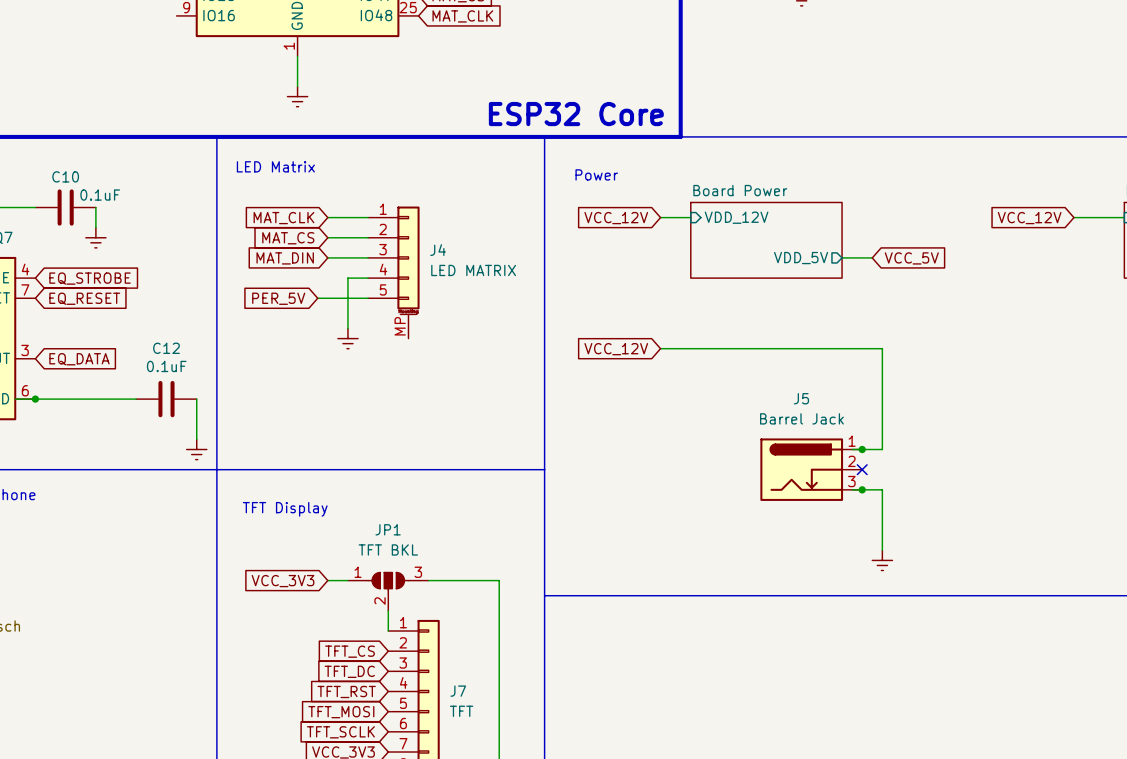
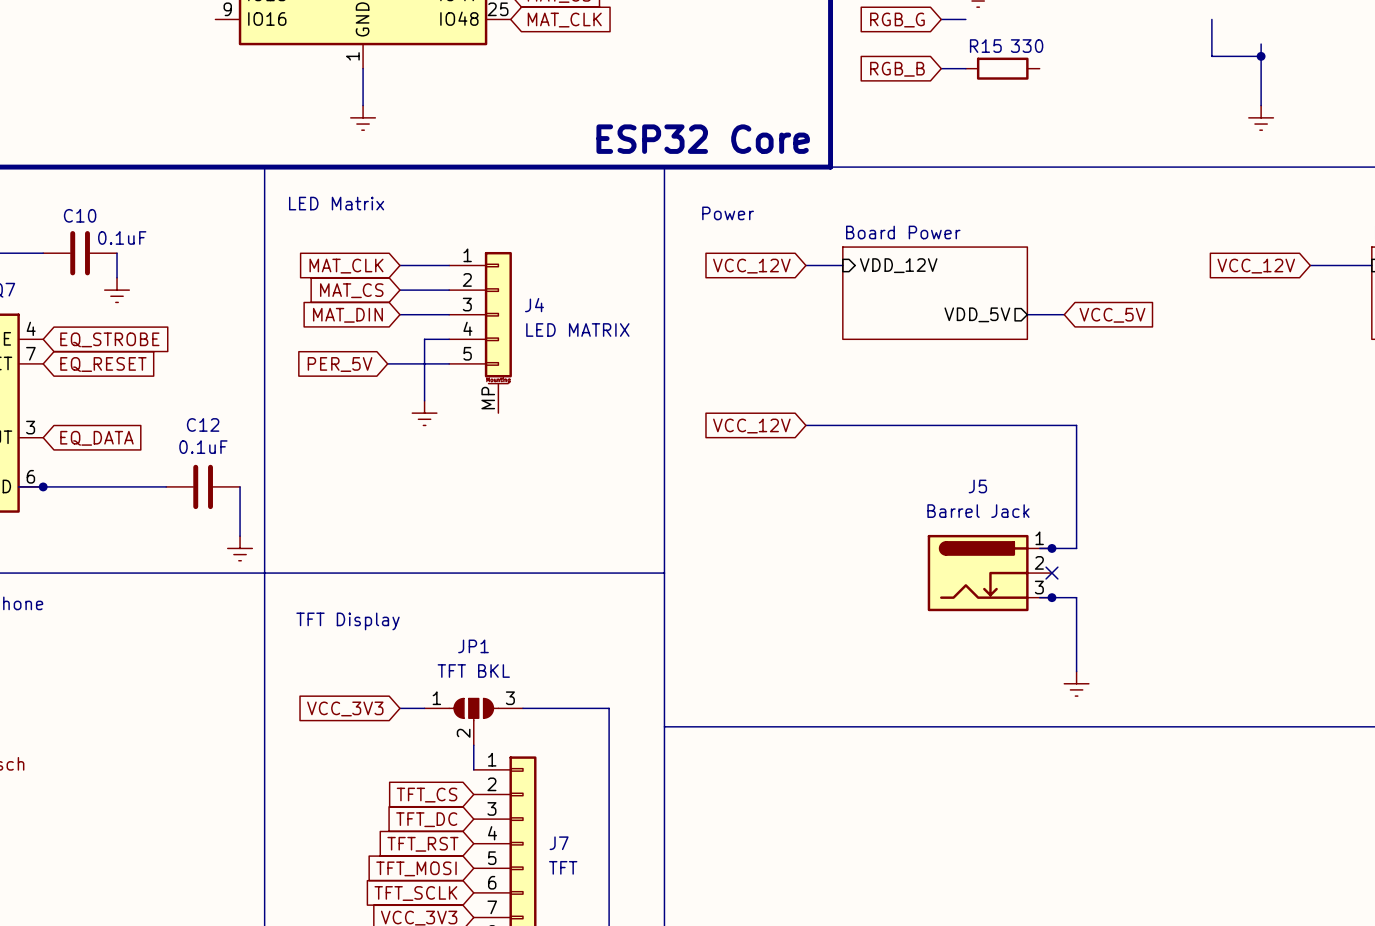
wire: none -> (941, 19) (965, 19)
wire: none -> (1211, 19) (1211, 56) (1261, 56)
global label: none -> RGB_G (897, 20)
wire: none -> (1261, 44) (1261, 105)
junction: none -> (1261, 56)
global label: none -> RGB_B (897, 69)
wire: none -> (941, 68) (965, 68)
R15: none -> 330 (1002, 68)
power symbol: none -> (1261, 117)

